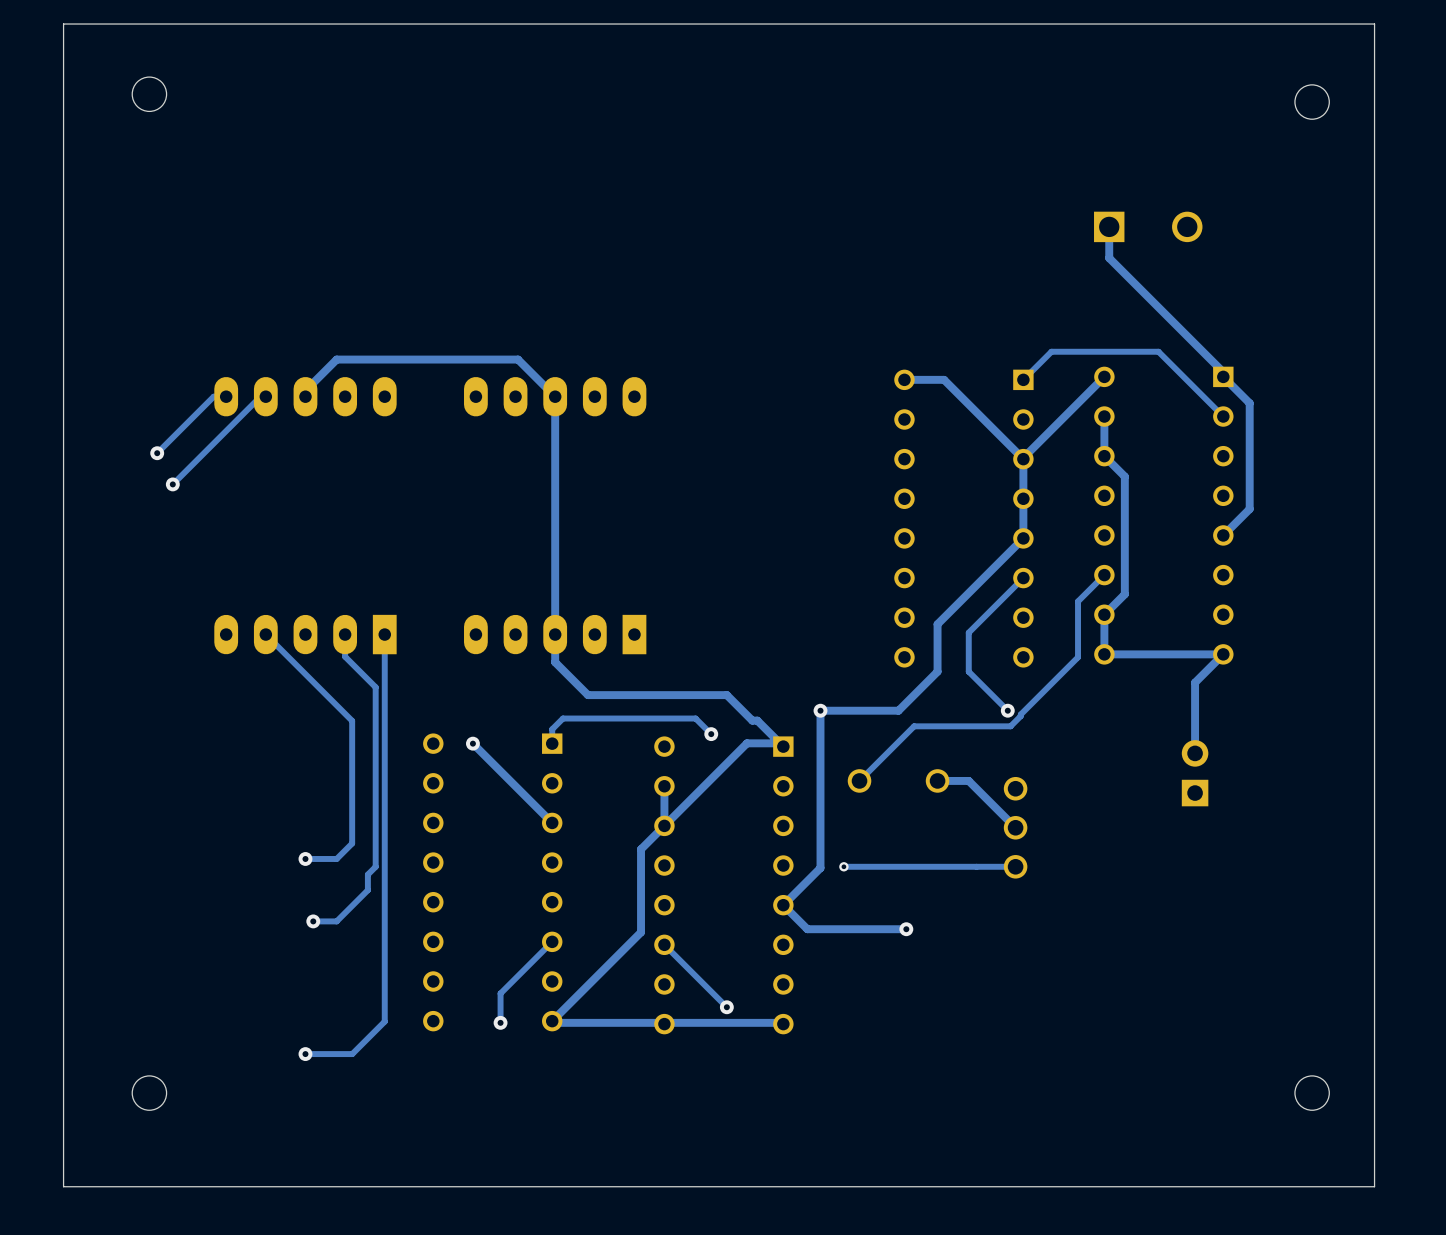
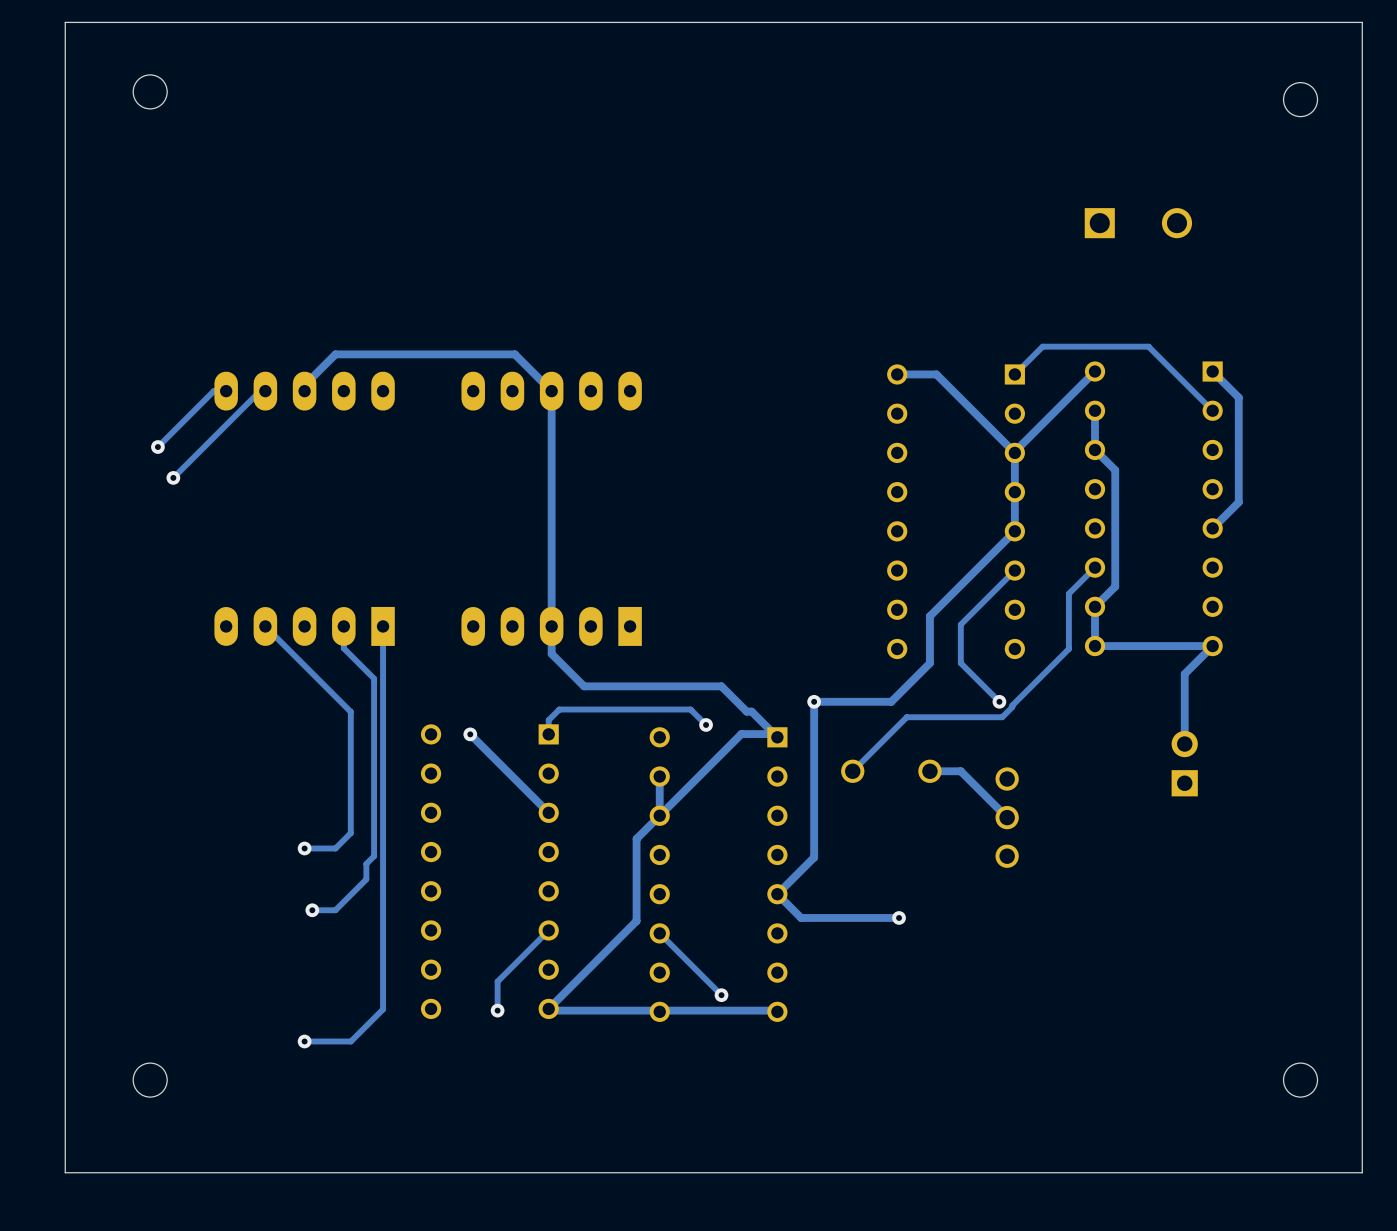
track: (1109, 226) (1109, 258) (1223, 372) (1223, 376) -> none
via: (843, 866) -> none
track: (1015, 866) (843, 866) -> none

